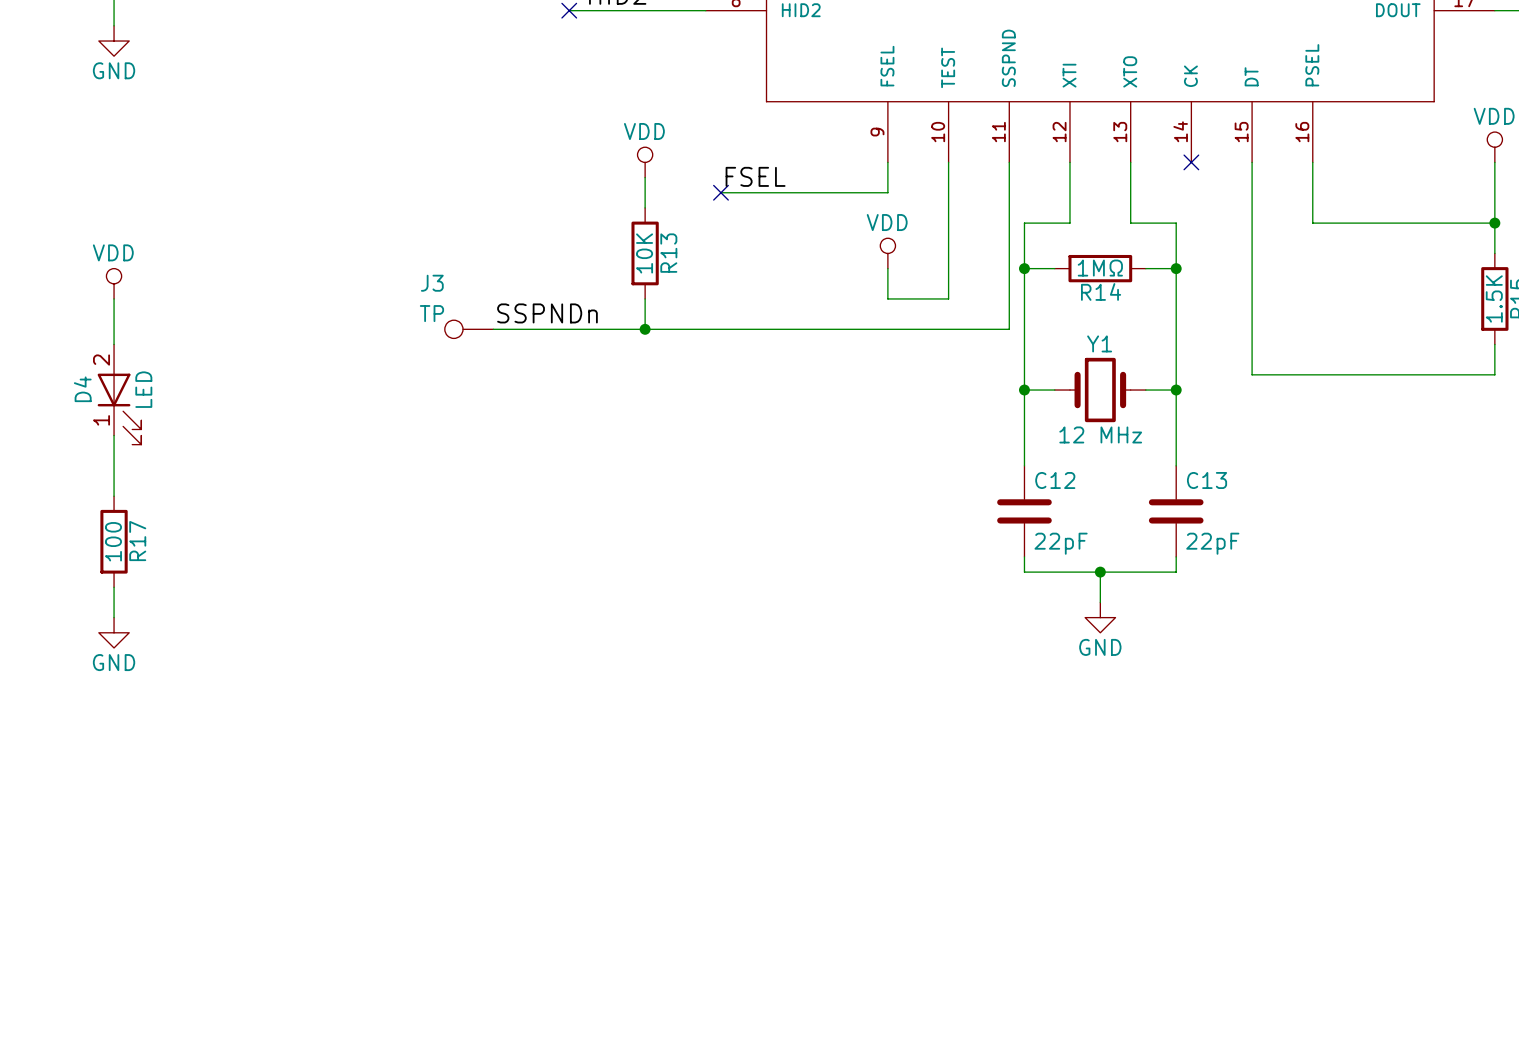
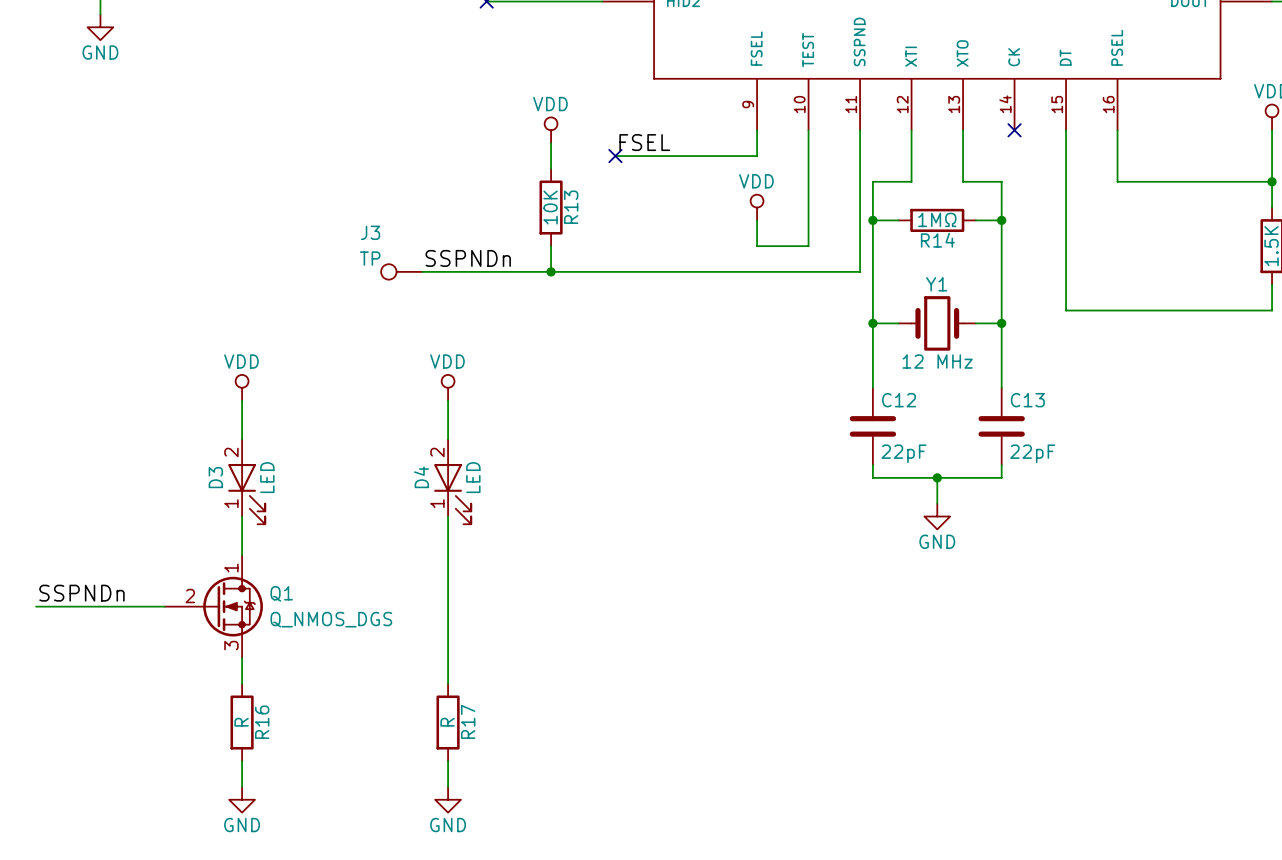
power symbol: VDD (114, 283) -> none
wire: (114, 298) (114, 344) -> (242, 400) (242, 439)
D4 position: (119, 394) -> (452, 481)
wire: (114, 435) (114, 496) -> none
power symbol: none -> VDD (242, 387)
power symbol: none -> VDD (448, 387)
wire: none -> (448, 400) (448, 439)
R17 value: 100 (113, 541) -> R (447, 722)
R17 position: (114, 541) -> (448, 722)
D3: none -> LED (246, 481)
wire: (114, 587) (114, 617) -> (242, 658) (242, 683)
wire: none -> (242, 516) (242, 555)
wire: none -> (448, 516) (448, 683)
power symbol: GND (114, 632) -> none
label: none -> SSPNDn (81, 593)
wire: none -> (36, 606) (164, 606)
Q1: none -> Q_NMOS_DGS (213, 606)
R16: none -> R (242, 722)
wire: none -> (242, 761) (242, 786)
wire: none -> (448, 761) (448, 786)
power symbol: none -> GND (242, 799)
power symbol: none -> GND (448, 799)

